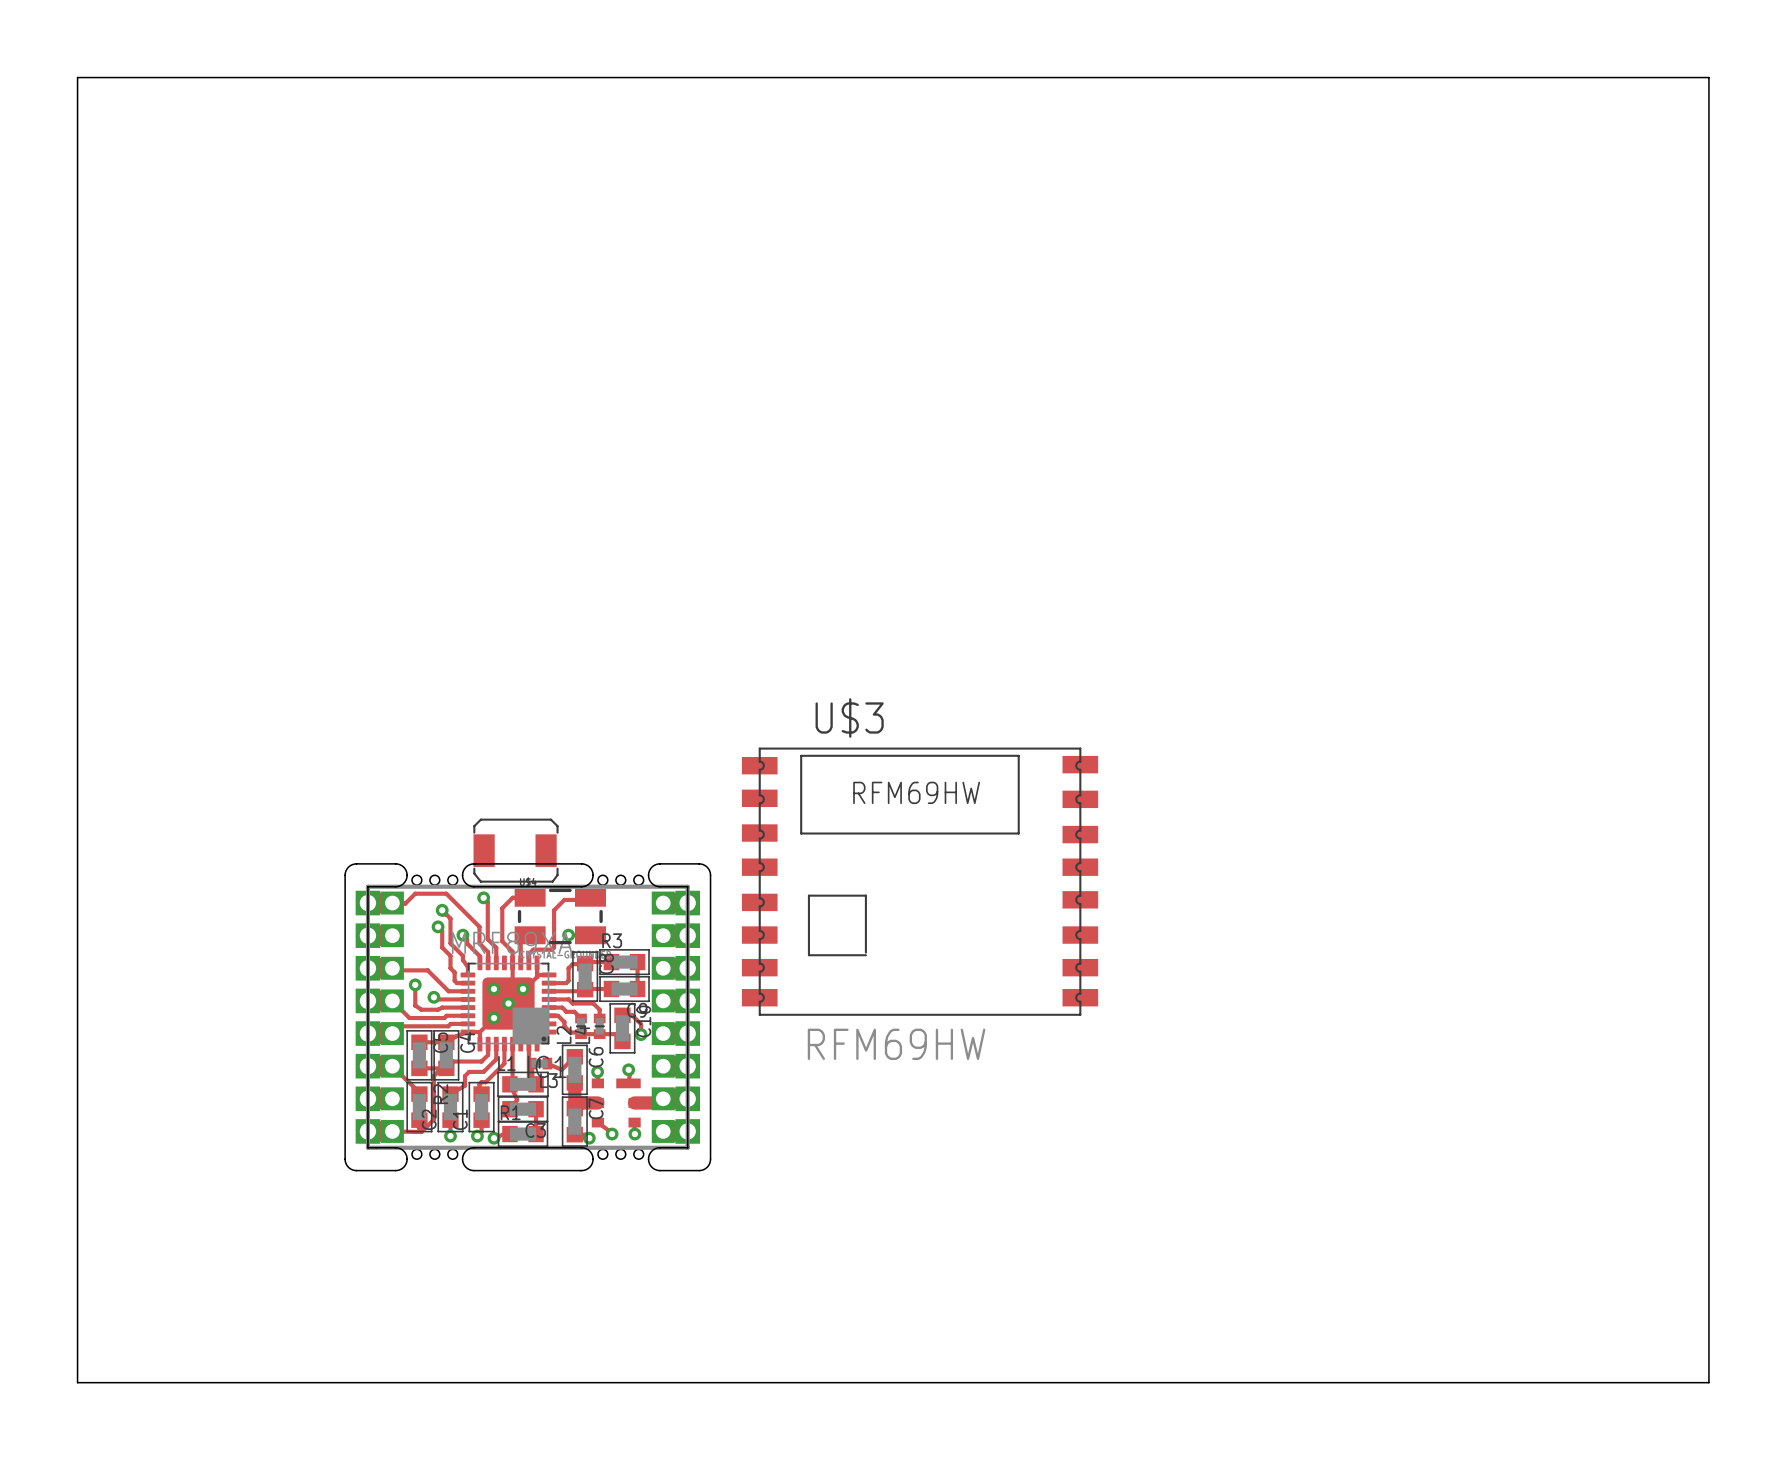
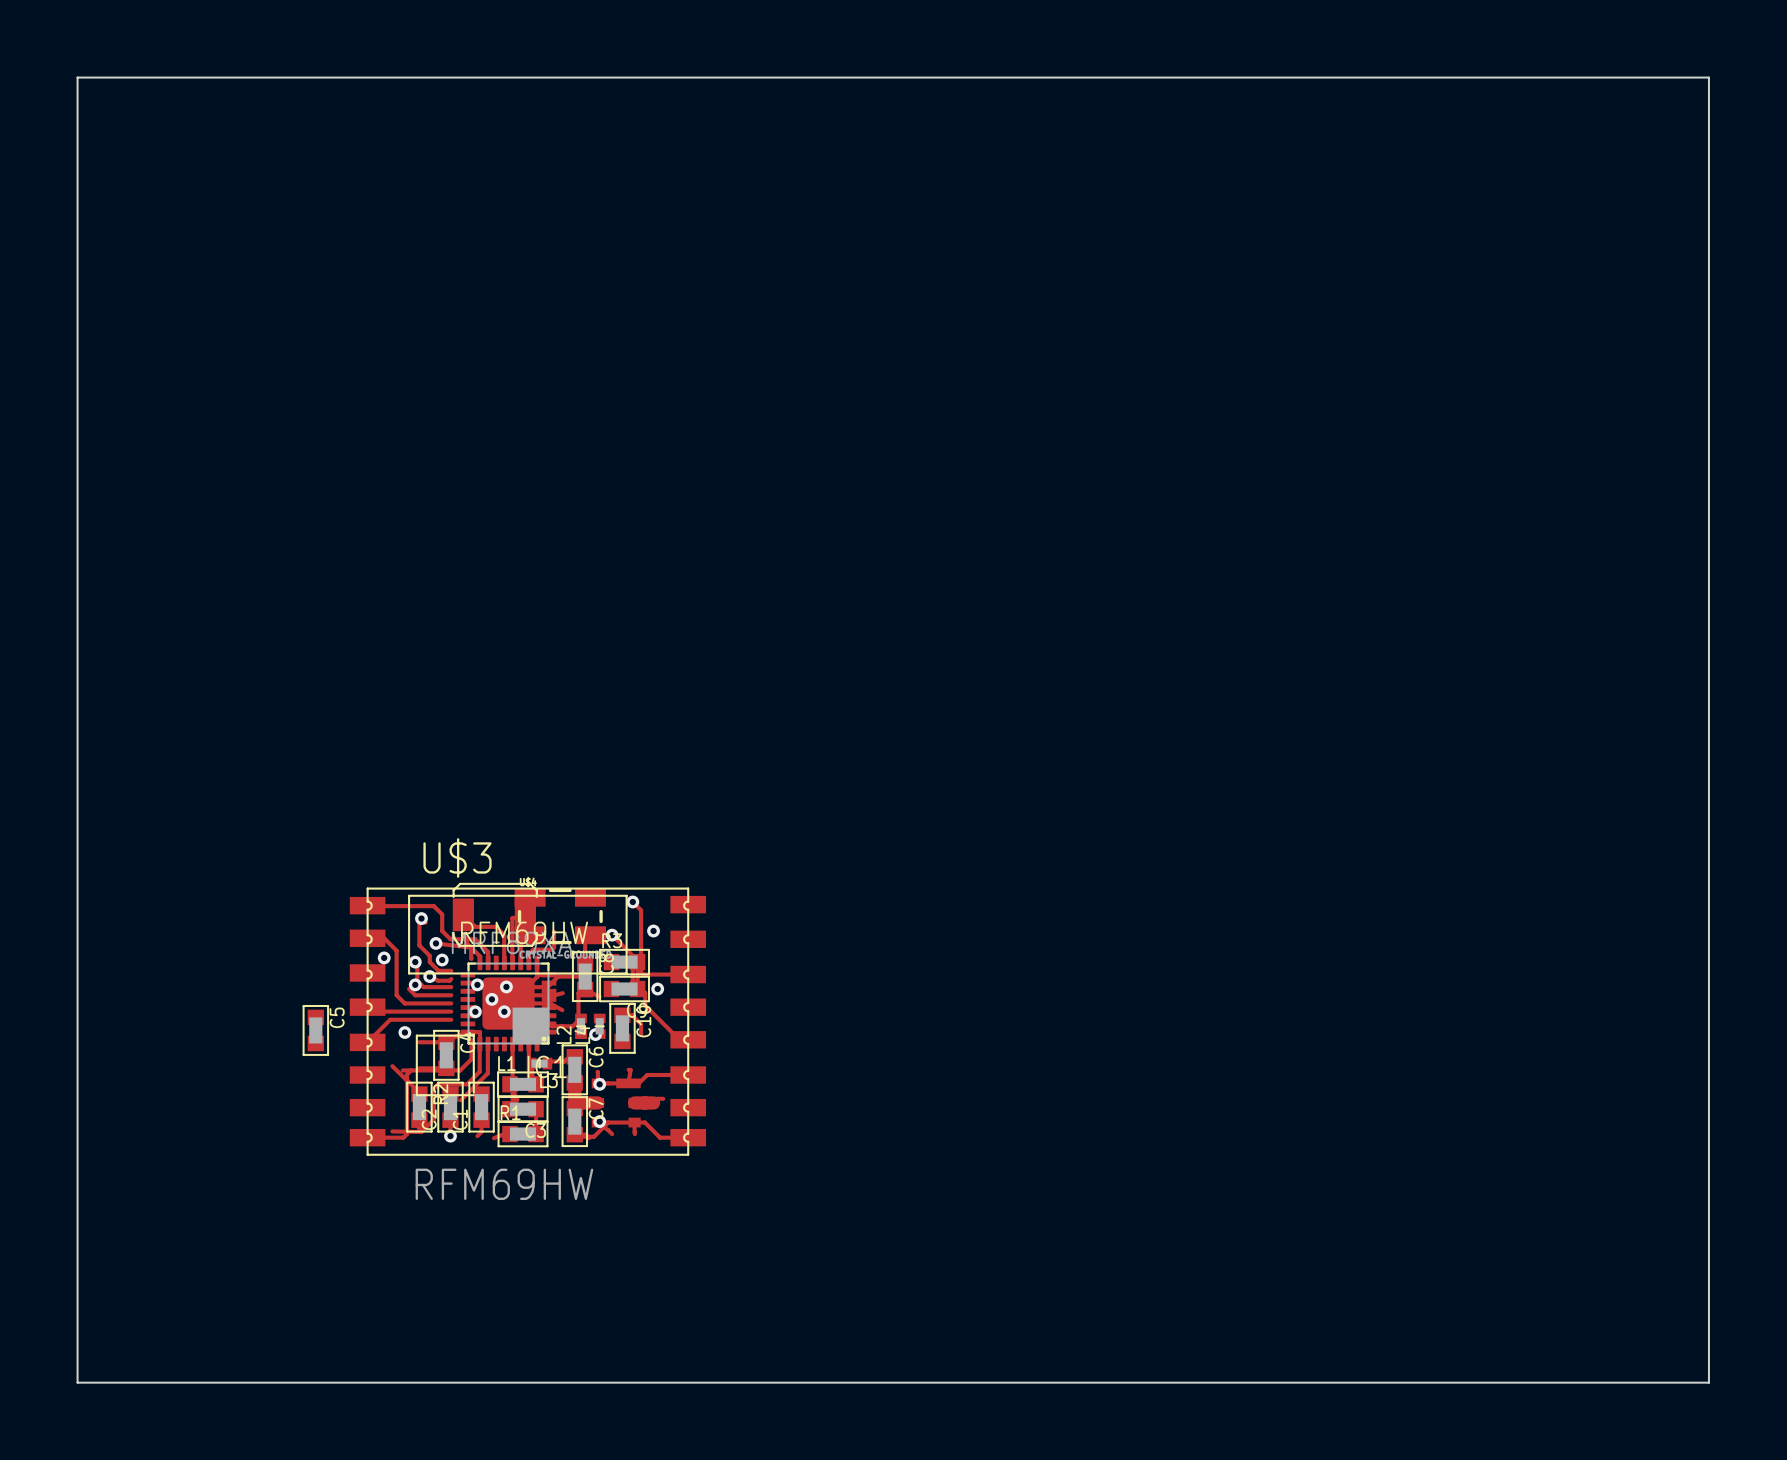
part position: (515, 850) -> (495, 914)
U$3 position: (920, 881) -> (527, 1021)
track: (483, 897) (487, 902) (487, 939) (496, 947) (496, 962) -> none
via: (483, 897) -> none
track: (530, 897) (512, 897) (502, 908) (502, 941) (512, 951) (512, 999) (479, 1032) -> none
track: (590, 897) (586, 899) (564, 899) (554, 910) (554, 931) -> none
track: none -> (632, 902) (641, 910) (641, 972) (643, 974) (688, 974)
via: none -> (632, 902)
track: (392, 903) (405, 903) (415, 893) (446, 893) (479, 926) (479, 943) -> (367, 905) (433, 906) (442, 914) (442, 931) (450, 939) (475, 939) (479, 943)
track: (442, 910) (442, 914) (446, 914) (450, 918) (450, 943) (462, 955) (462, 960) (467, 967) (467, 974) -> none
via: (442, 910) -> none
track: none -> (463, 914) (475, 926) (496, 926) (504, 934) (504, 958)
track: none -> (525, 914) (512, 918) (512, 958)
via: none -> (421, 918)
track: none -> (425, 922) (421, 918) (419, 920) (419, 945) (429, 955) (429, 962) (438, 970) (451, 970)
track: (438, 926) (442, 931) (442, 947) (450, 955) (450, 968) (454, 972) (454, 980) (457, 983) (467, 983) -> none
via: (438, 926) -> none
track: none -> (585, 931) (587, 972) (583, 976) (558, 976) (547, 987) (532, 987)
via: none -> (653, 931)
via: (462, 935) -> none
via: (568, 935) -> none
track: none -> (612, 935) (632, 955) (632, 980) (645, 993) (645, 1005) (679, 1039) (688, 1039)
via: none -> (612, 935)
track: none -> (367, 938) (384, 938) (396, 950) (396, 995) (404, 1003) (451, 1003)
track: none -> (435, 943) (471, 947) (471, 958)
via: none -> (435, 943)
via: none -> (384, 957)
via: none -> (442, 960)
track: none -> (415, 962) (417, 964) (417, 980) (423, 987) (451, 987)
via: none -> (415, 962)
track: (611, 962) (572, 964) (568, 968) (568, 980) (566, 983) (549, 983) -> none
track: (392, 968) (394, 970) (427, 970) (448, 991) (467, 991) -> none
track: none -> (429, 976) (438, 980) (449, 980) (451, 978)
via: none -> (429, 976)
track: (415, 984) (415, 1005) (421, 1009) (467, 1007) -> none
via: none -> (477, 984)
via: none -> (506, 986)
track: none -> (409, 989) (415, 995) (451, 995)
via: (494, 989) -> none
via: (523, 989) -> none
track: (611, 989) (549, 991) -> none
via: none -> (657, 989)
track: none -> (562, 993) (554, 995) (532, 995)
track: none -> (599, 996) (592, 993) (578, 993) (578, 1020) (572, 1026) (552, 1026) (547, 1022) (547, 1013) (545, 1011) (532, 1011)
track: (433, 997) (438, 999) (467, 999) -> none
via: (433, 997) -> none
via: none -> (491, 999)
track: (549, 999) (568, 999) (572, 1003) (593, 1003) (599, 1009) (599, 1018) -> none
track: (392, 1000) (409, 1018) (467, 1015) -> none
via: (508, 1003) -> none
track: none -> (532, 1003) (550, 1003) (562, 1010)
track: (549, 1007) (562, 1007) (566, 1011) (574, 1011) (581, 1018) -> none
track: none -> (367, 1009) (367, 1007) (372, 1011) (451, 1011)
via: none -> (475, 1011)
via: none -> (504, 1011)
track: (549, 1015) (558, 1015) (570, 1032) (615, 1034) (622, 1041) -> none
part: (527, 1017) -> none
part: (527, 1017) -> none
via: (494, 1018) -> none
track: none -> (451, 1019) (390, 1019) (367, 1042)
track: (467, 1023) (450, 1023) (448, 1026) (399, 1026) (392, 1033) (397, 1038) -> none
via: none -> (404, 1032)
via: none -> (595, 1034)
via: (641, 1034) -> none
track: none -> (471, 1039) (471, 1059) (460, 1070) (402, 1070)
track: none -> (487, 1039) (487, 1073) (460, 1100)
track: (488, 1044) (488, 1054) (481, 1061) (453, 1061) (446, 1068) (437, 1072) (433, 1076) (433, 1088) -> (479, 1039) (479, 1071) (467, 1084) (438, 1084) (433, 1088)
track: (496, 1044) (496, 1059) (483, 1071) (469, 1071) (465, 1076) (465, 1085) (450, 1094) -> none
track: (504, 1044) (504, 1063) (485, 1082) (479, 1084) (479, 1098) (481, 1094) -> none
C5 position: (419, 1055) -> (315, 1030)
track: (574, 1056) (561, 1069) (547, 1063) -> none
track: none -> (574, 1058) (551, 1061)
via: (628, 1069) -> none
track: none -> (411, 1070) (406, 1074) (406, 1134) (403, 1137) (367, 1137)
via position: (597, 1071) -> (599, 1084)
track: none -> (688, 1075) (647, 1075) (638, 1083) (599, 1084)
track: none -> (599, 1121) (644, 1122) (660, 1137) (688, 1137)
via: none -> (599, 1121)
track: none -> (608, 1122) (594, 1136) (574, 1136)
via: (612, 1134) -> none
via: (634, 1134) -> none
via: (477, 1136) -> none
via: (494, 1138) -> none
via: (589, 1138) -> none

